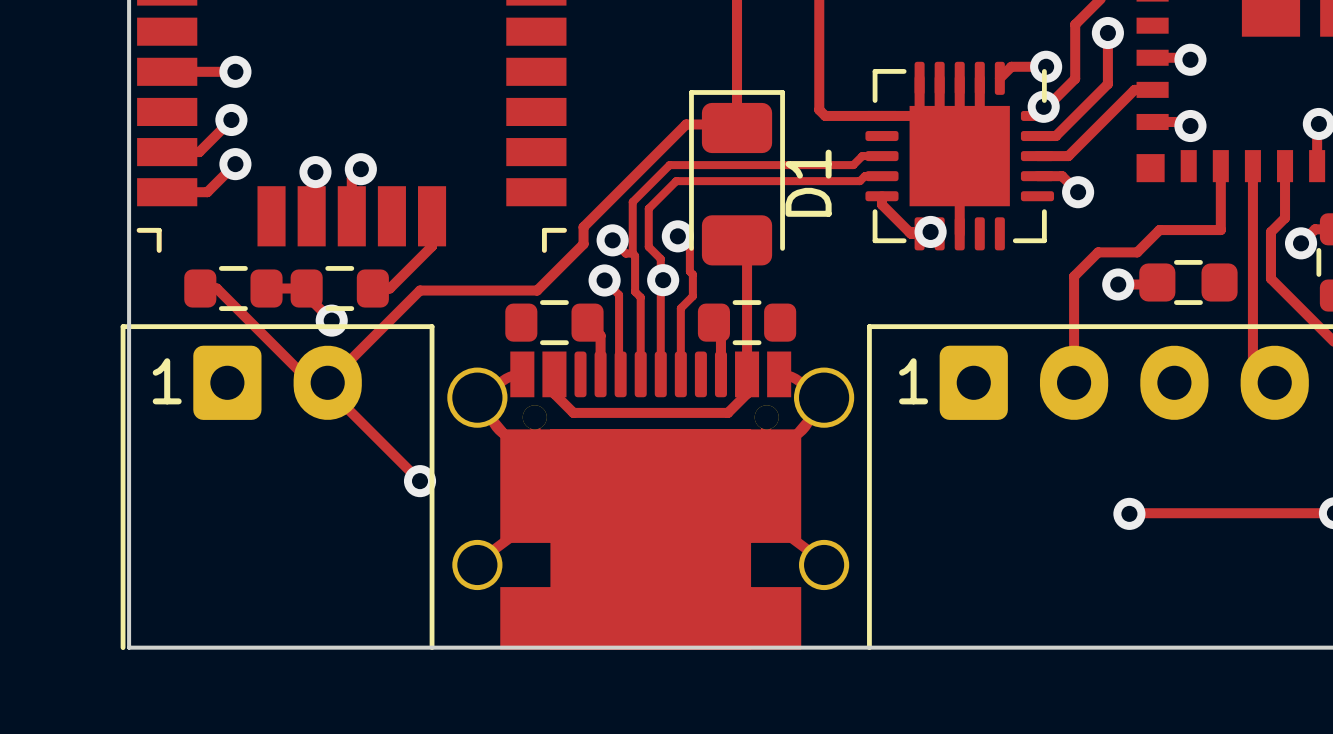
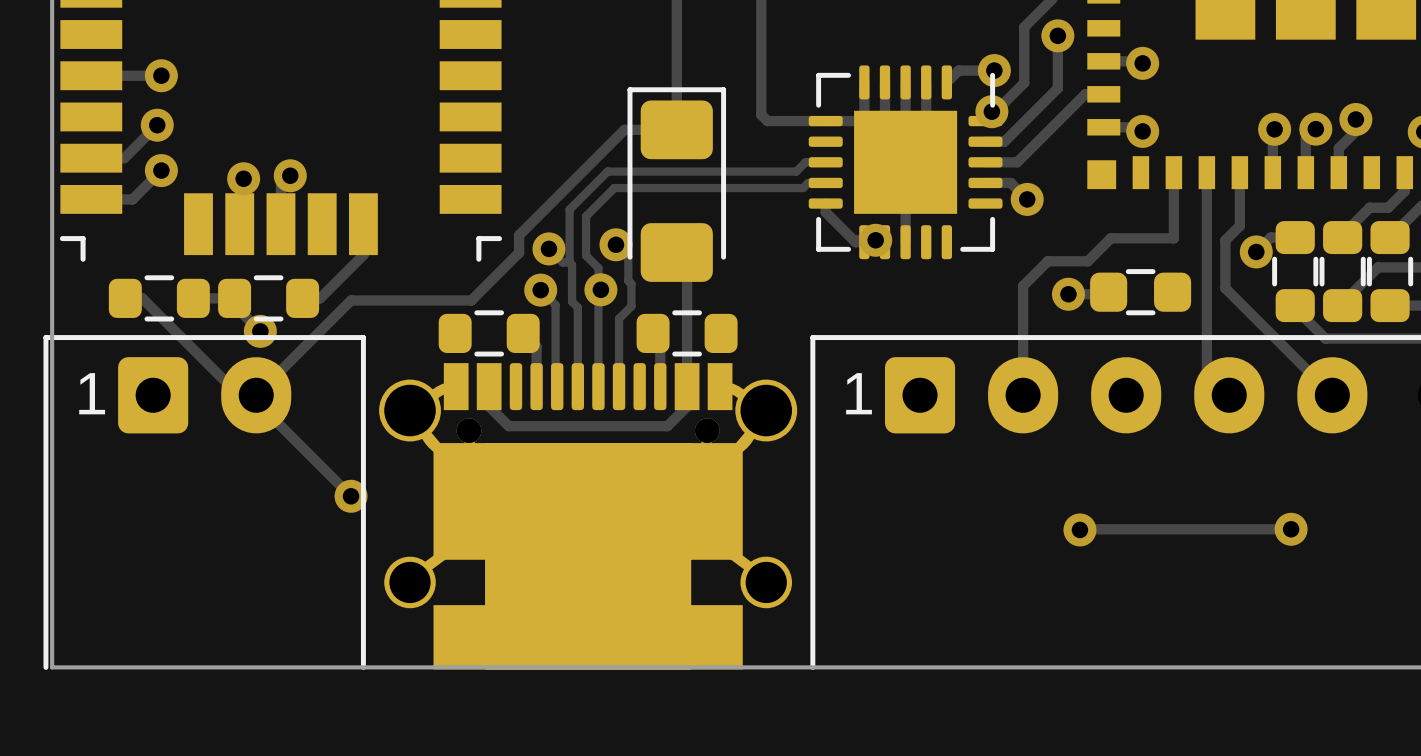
D1: (737, 177) -> none
part: none -> (676, 184)

